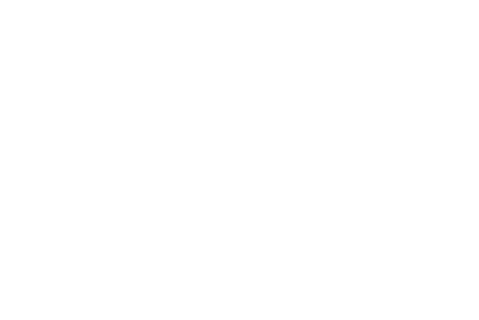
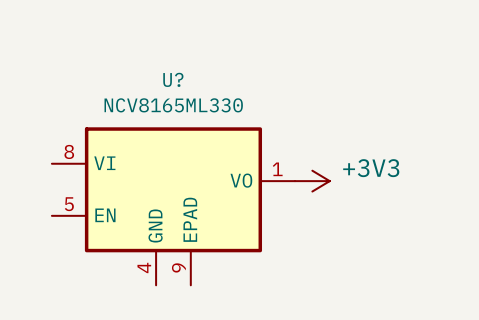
power symbol: none -> +3V3 (312, 181)
U?: none -> NCV8165ML330 (173, 206)

